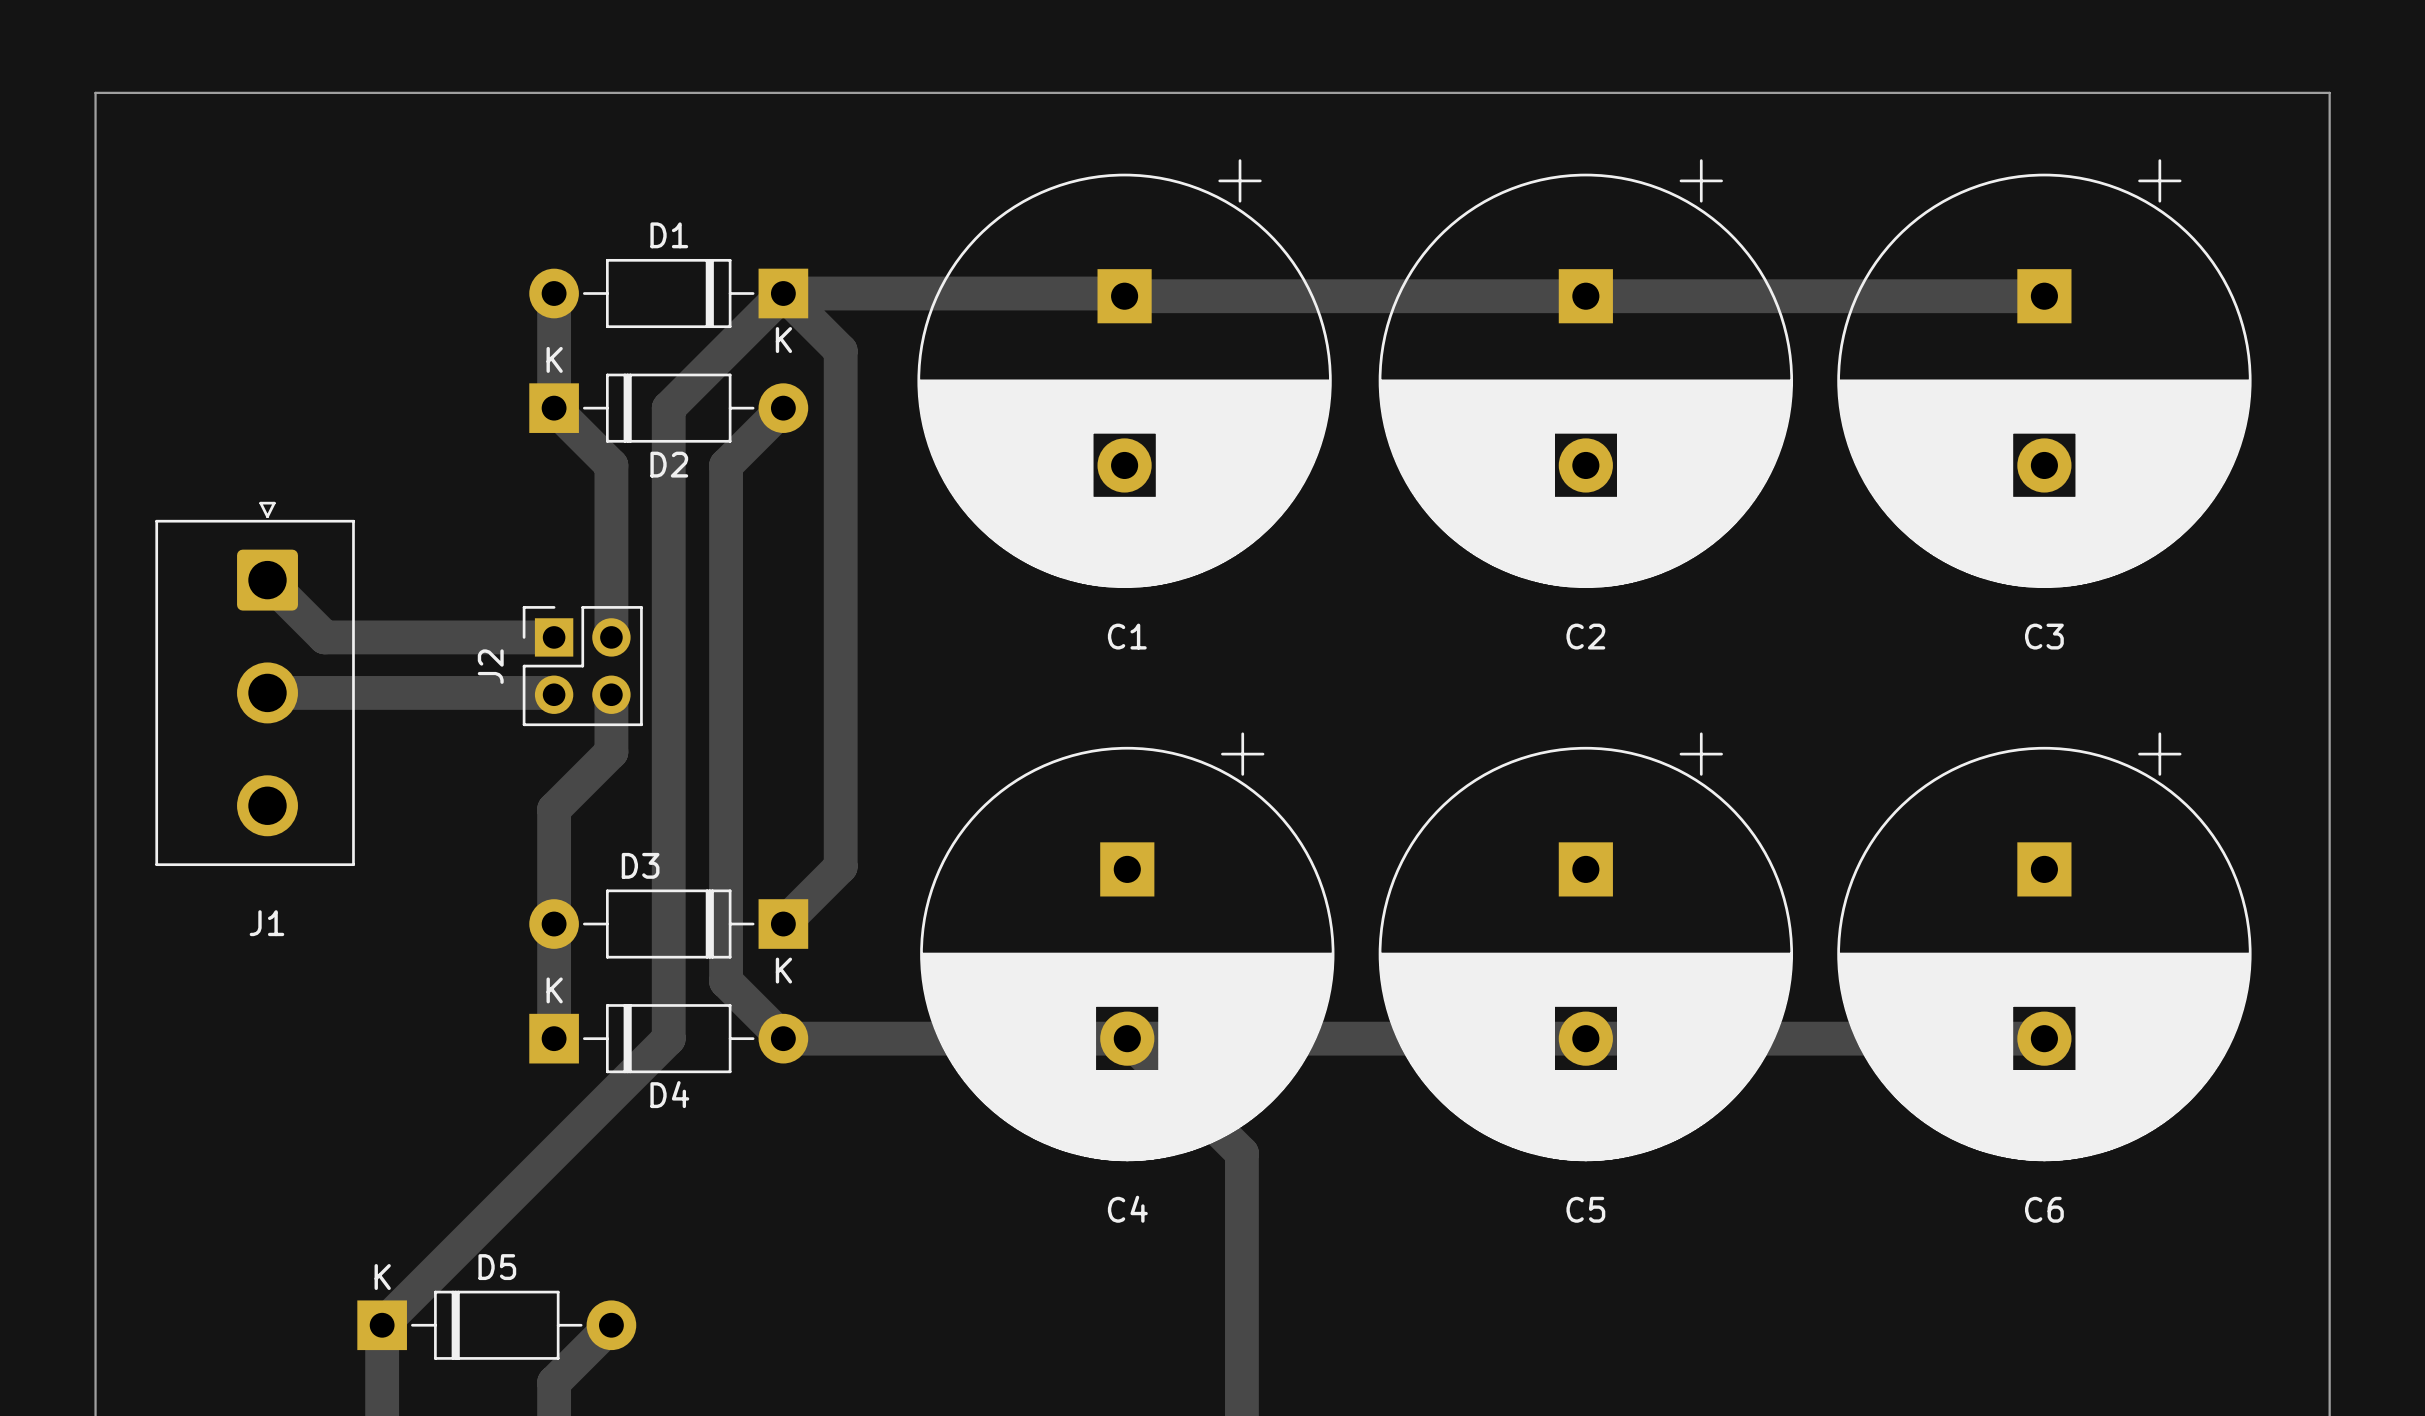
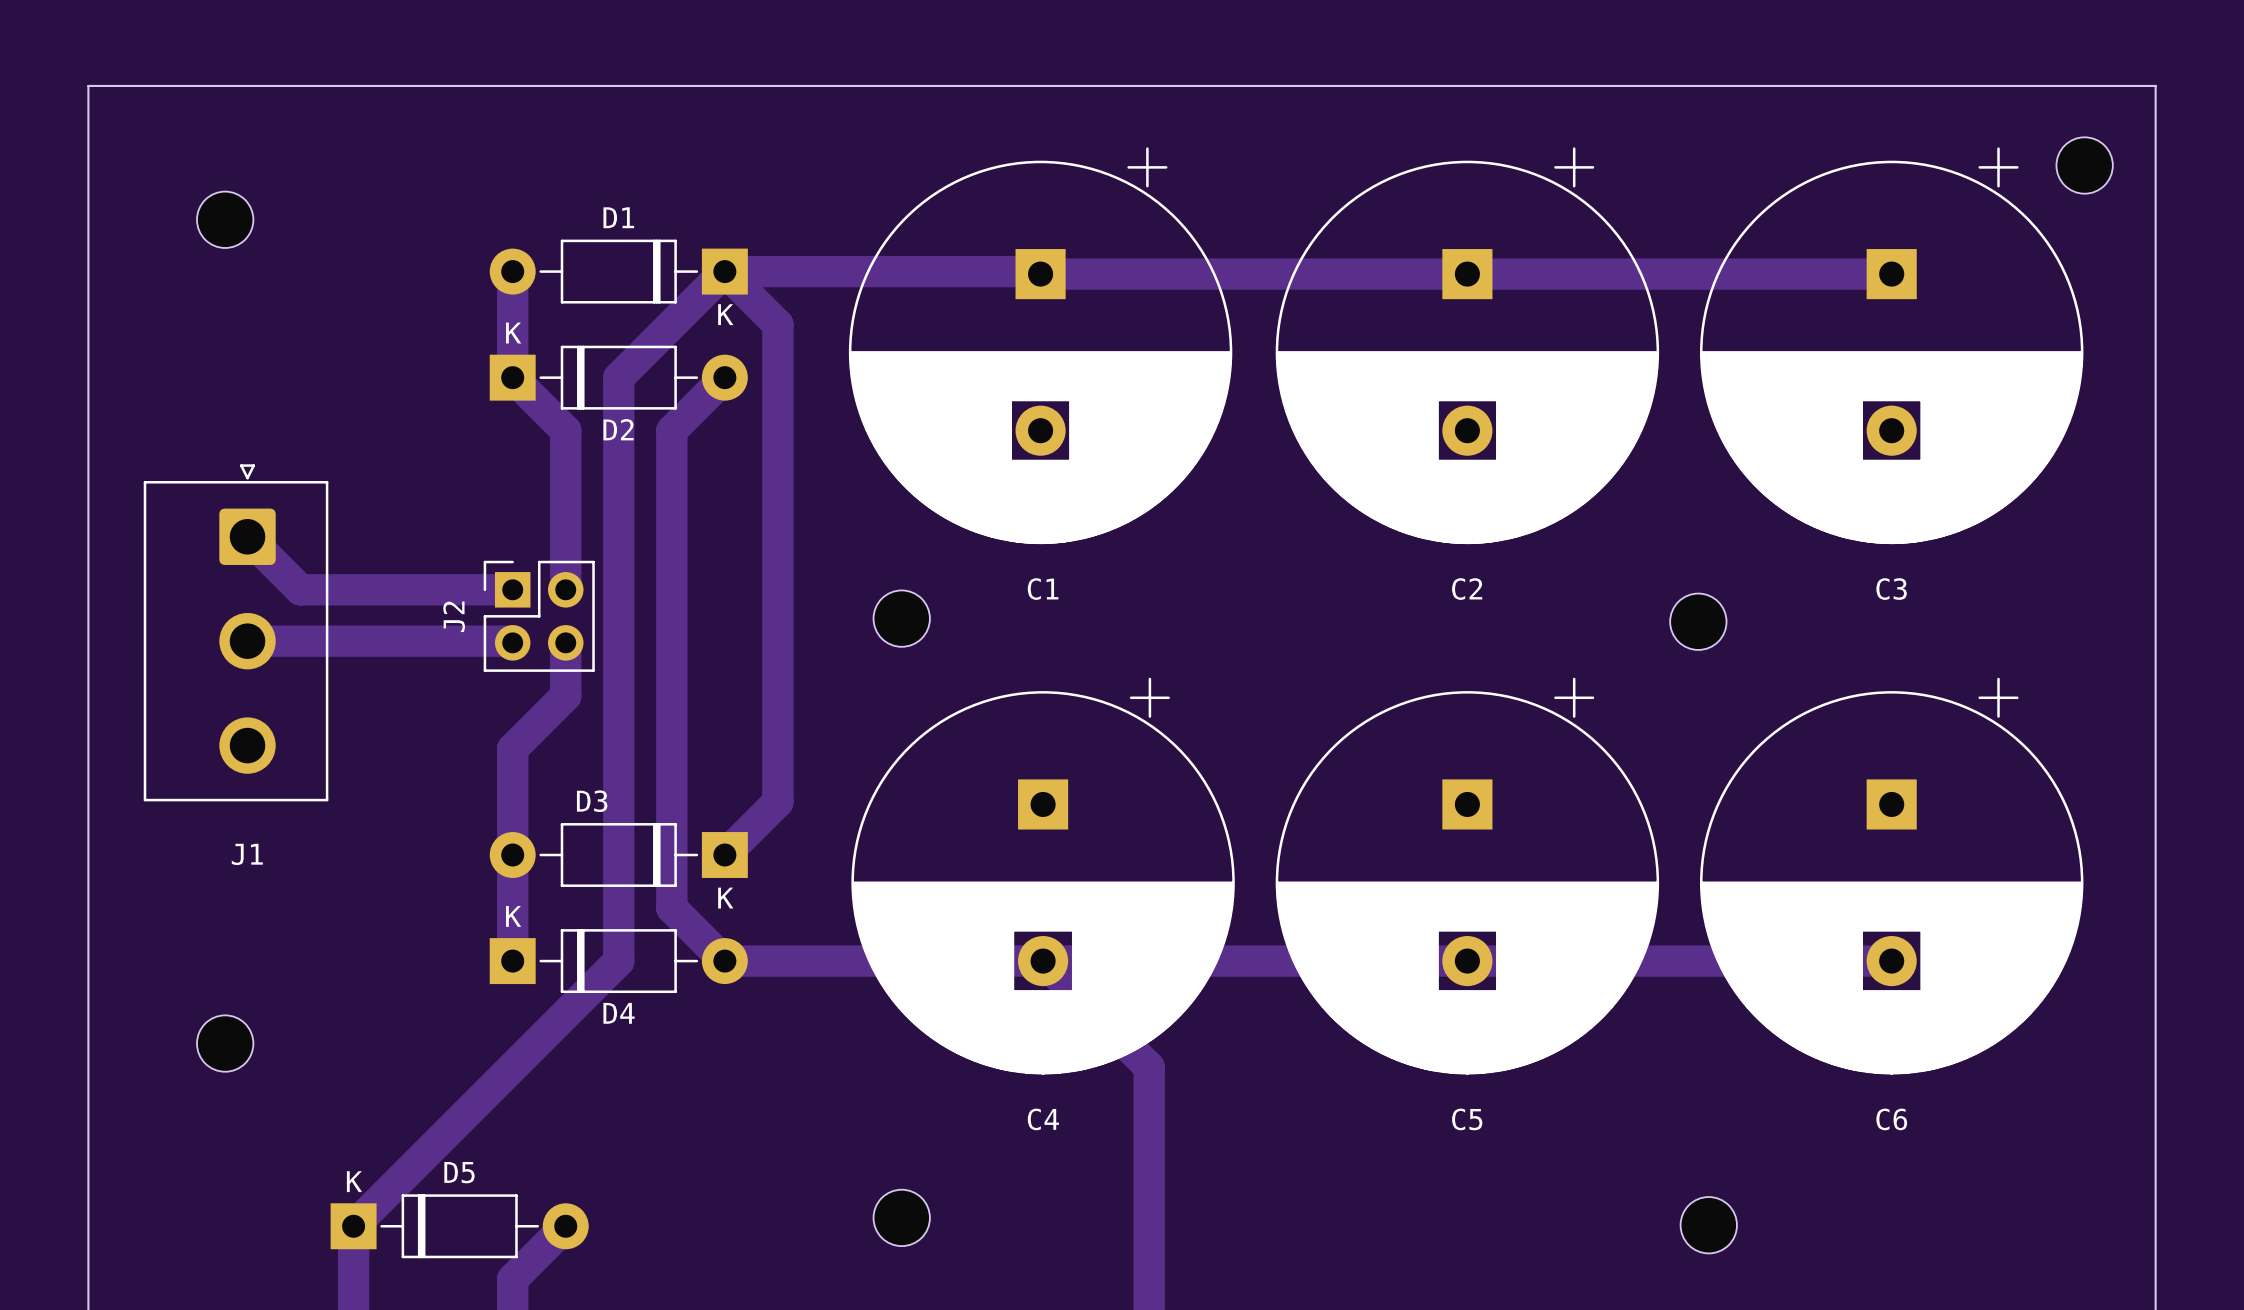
part: none -> (2084, 165)
part: none -> (225, 219)
part: none -> (901, 618)
part: none -> (1698, 621)
part: none -> (225, 1043)
part: none -> (901, 1217)
part: none -> (1708, 1225)

